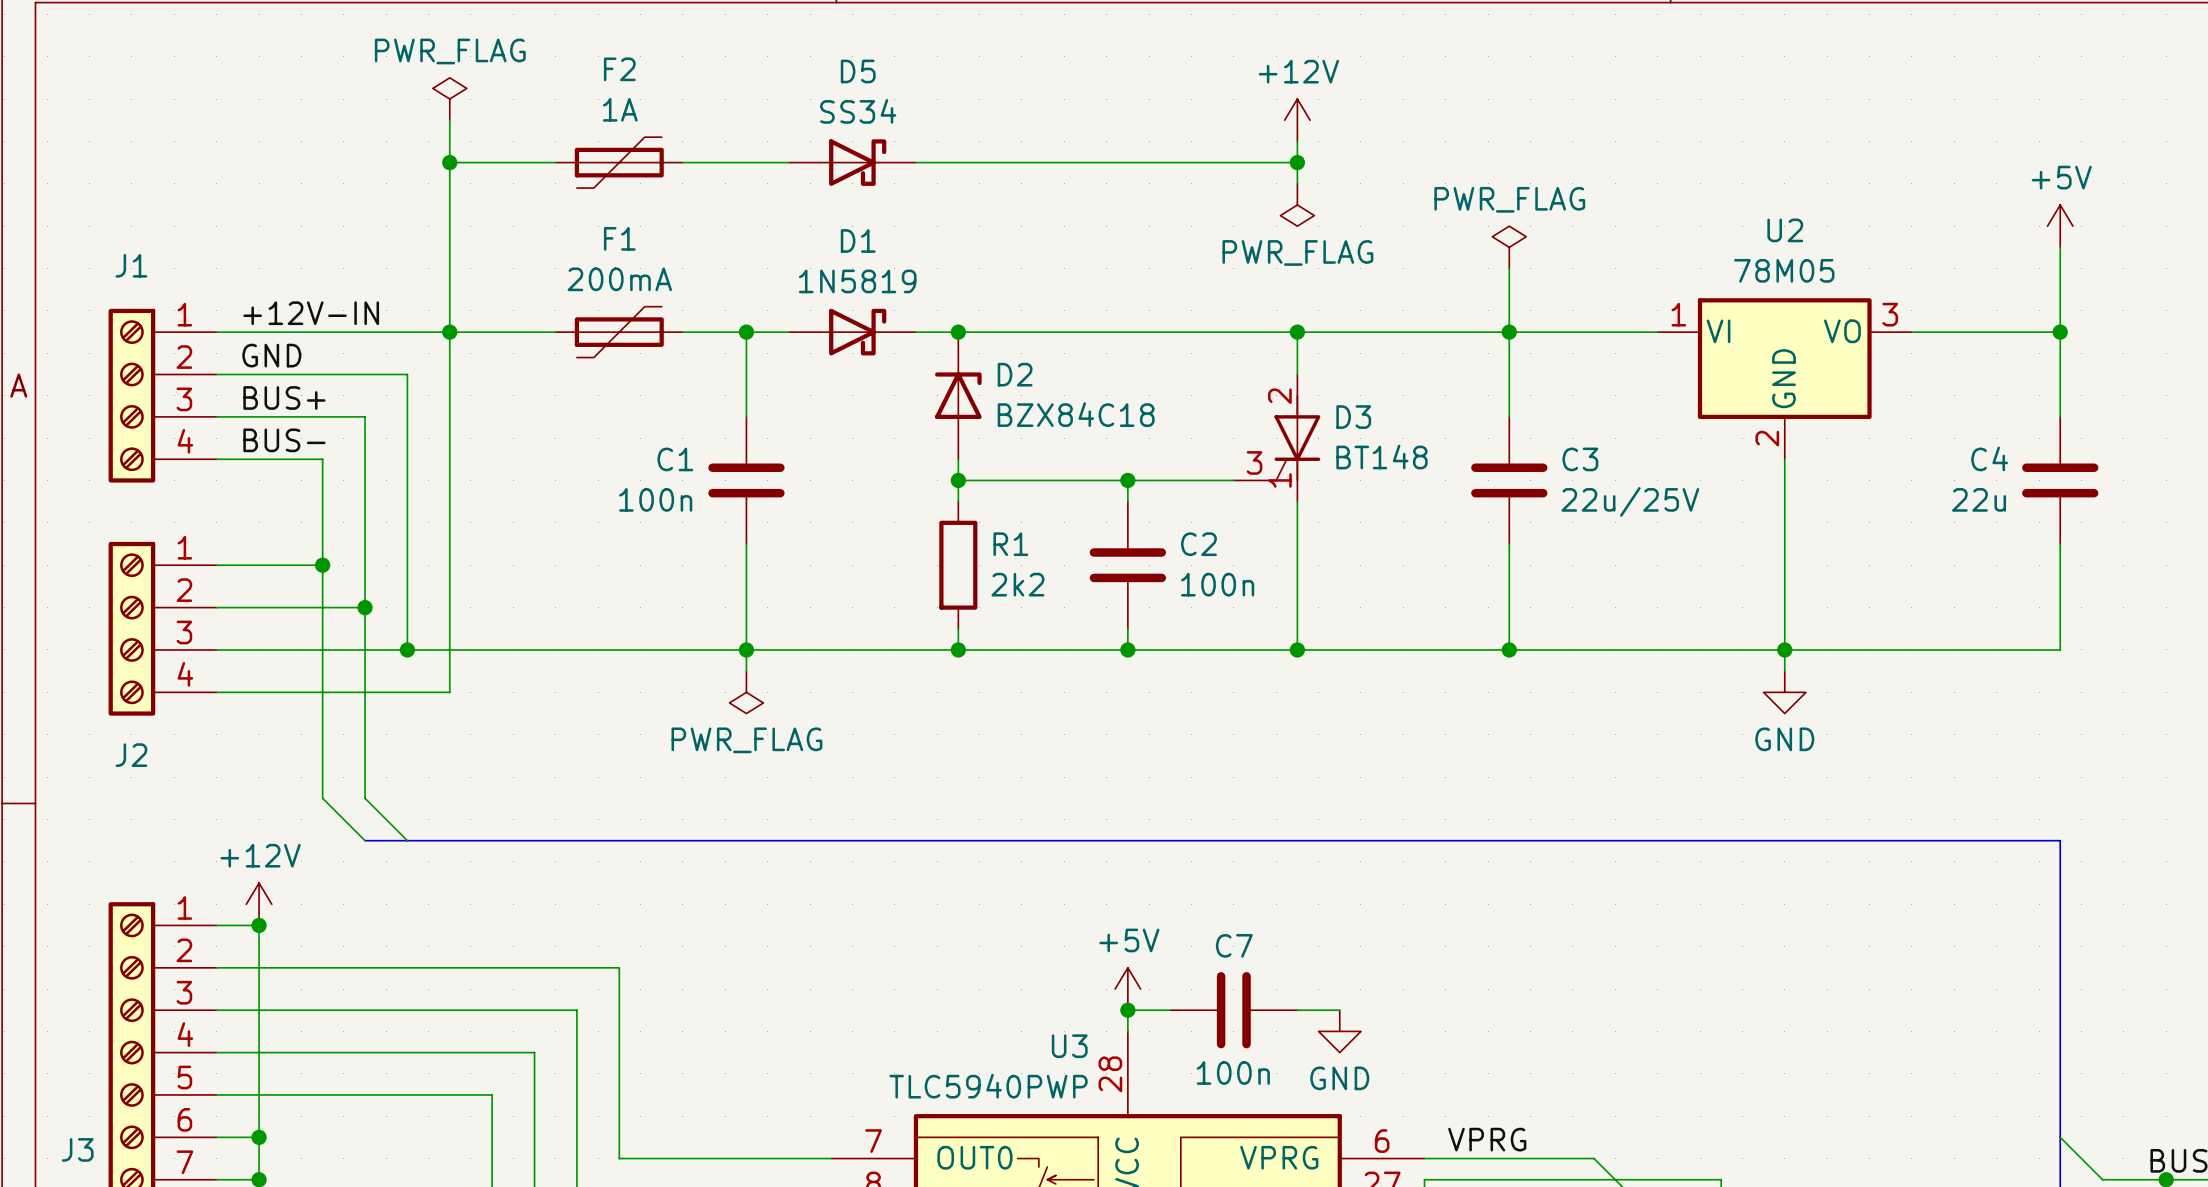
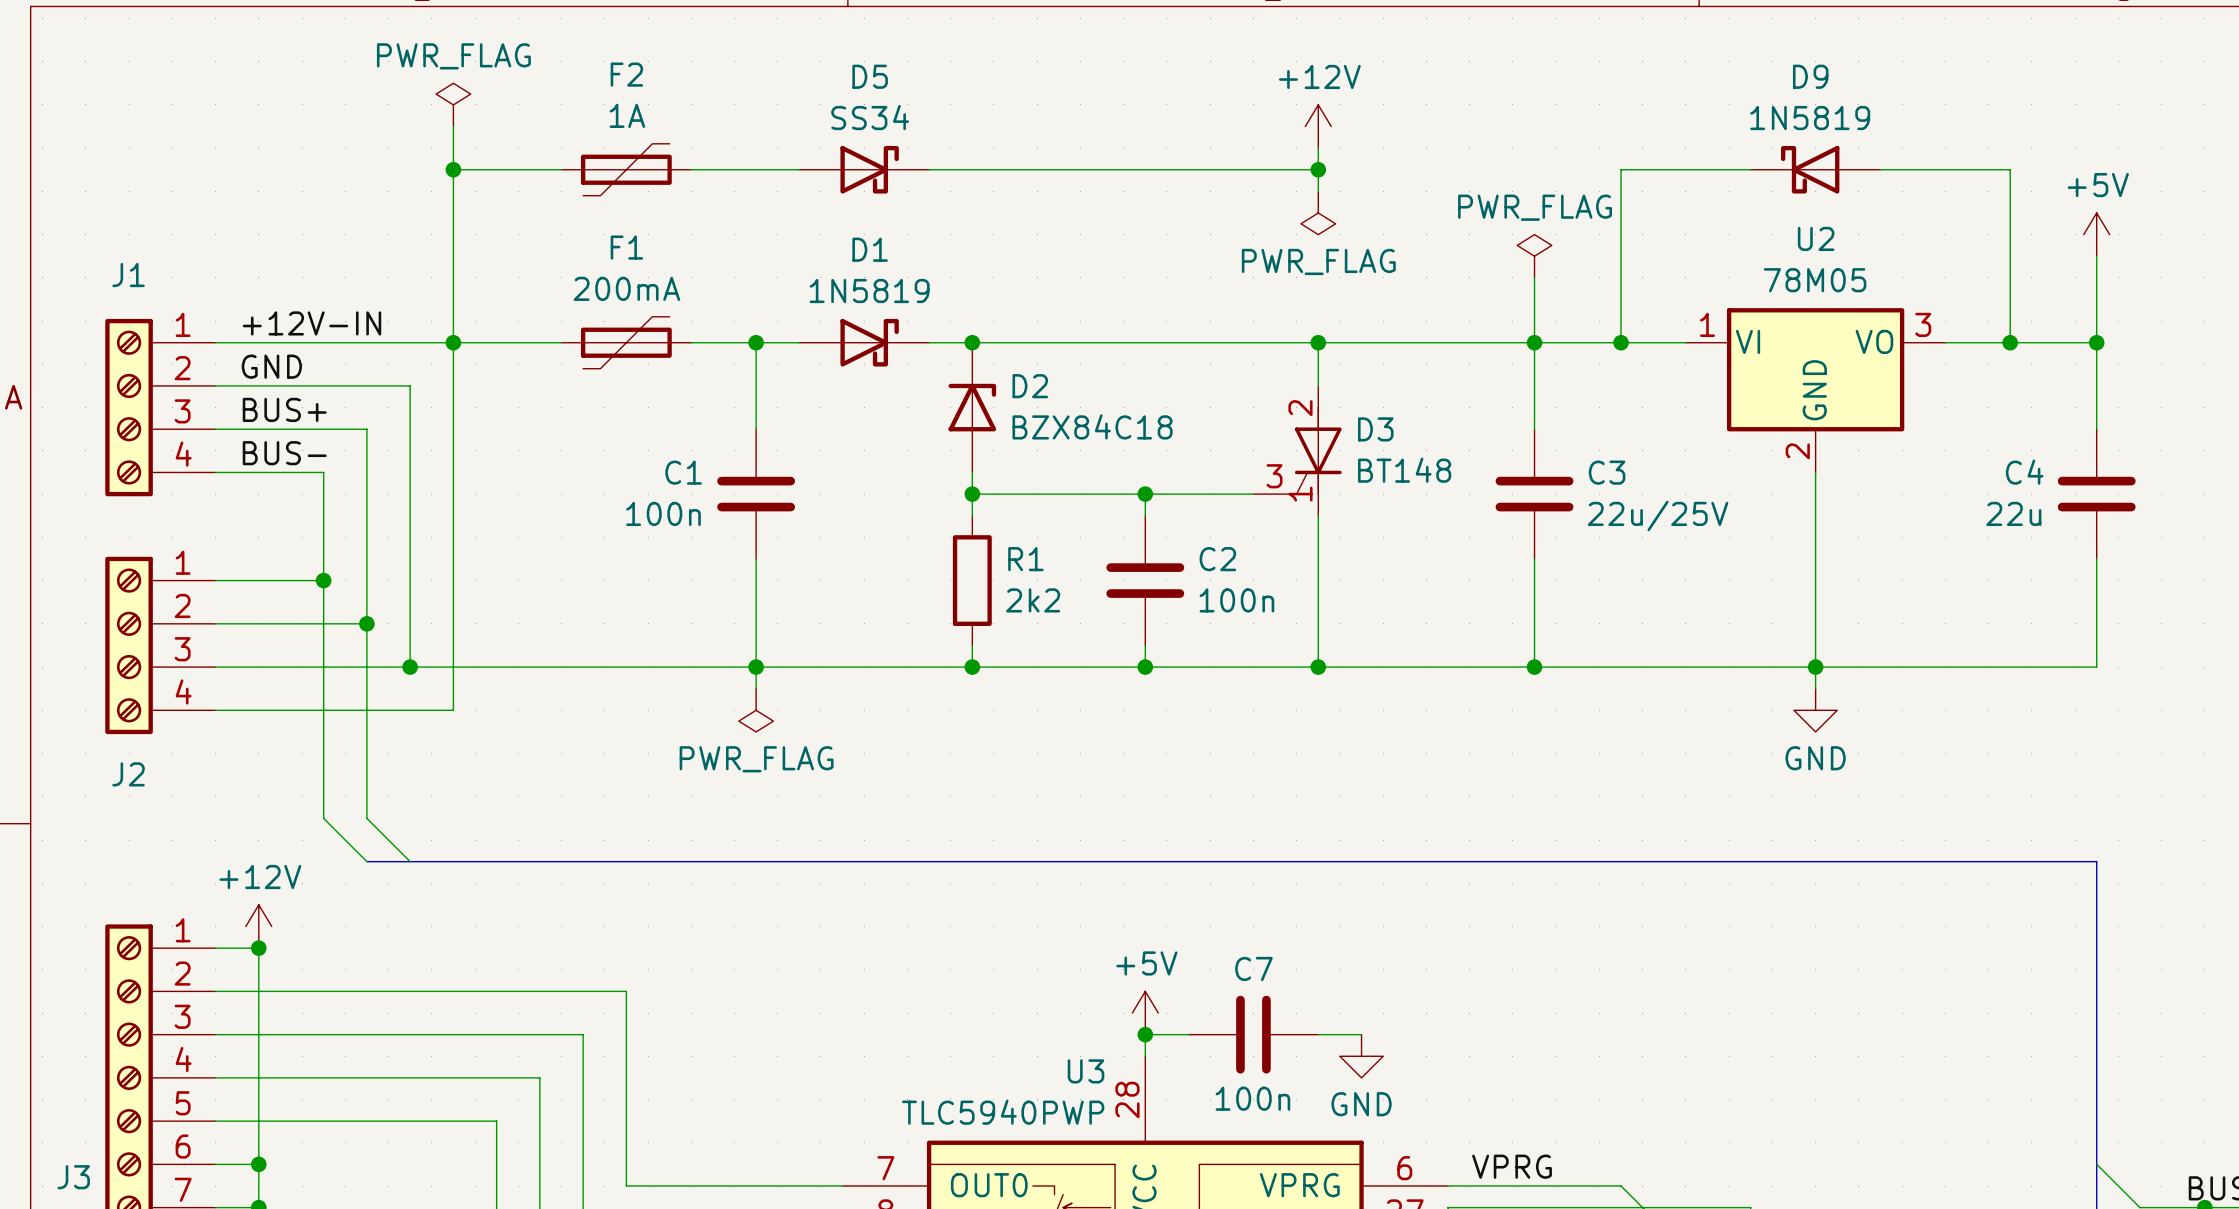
wire: none -> (1750, 169) (1621, 169) (1621, 342)
D9: none -> 1N5819 (1815, 169)
wire: none -> (1880, 169) (2010, 169) (2010, 342)
junction: none -> (1621, 342)
junction: none -> (2010, 342)

